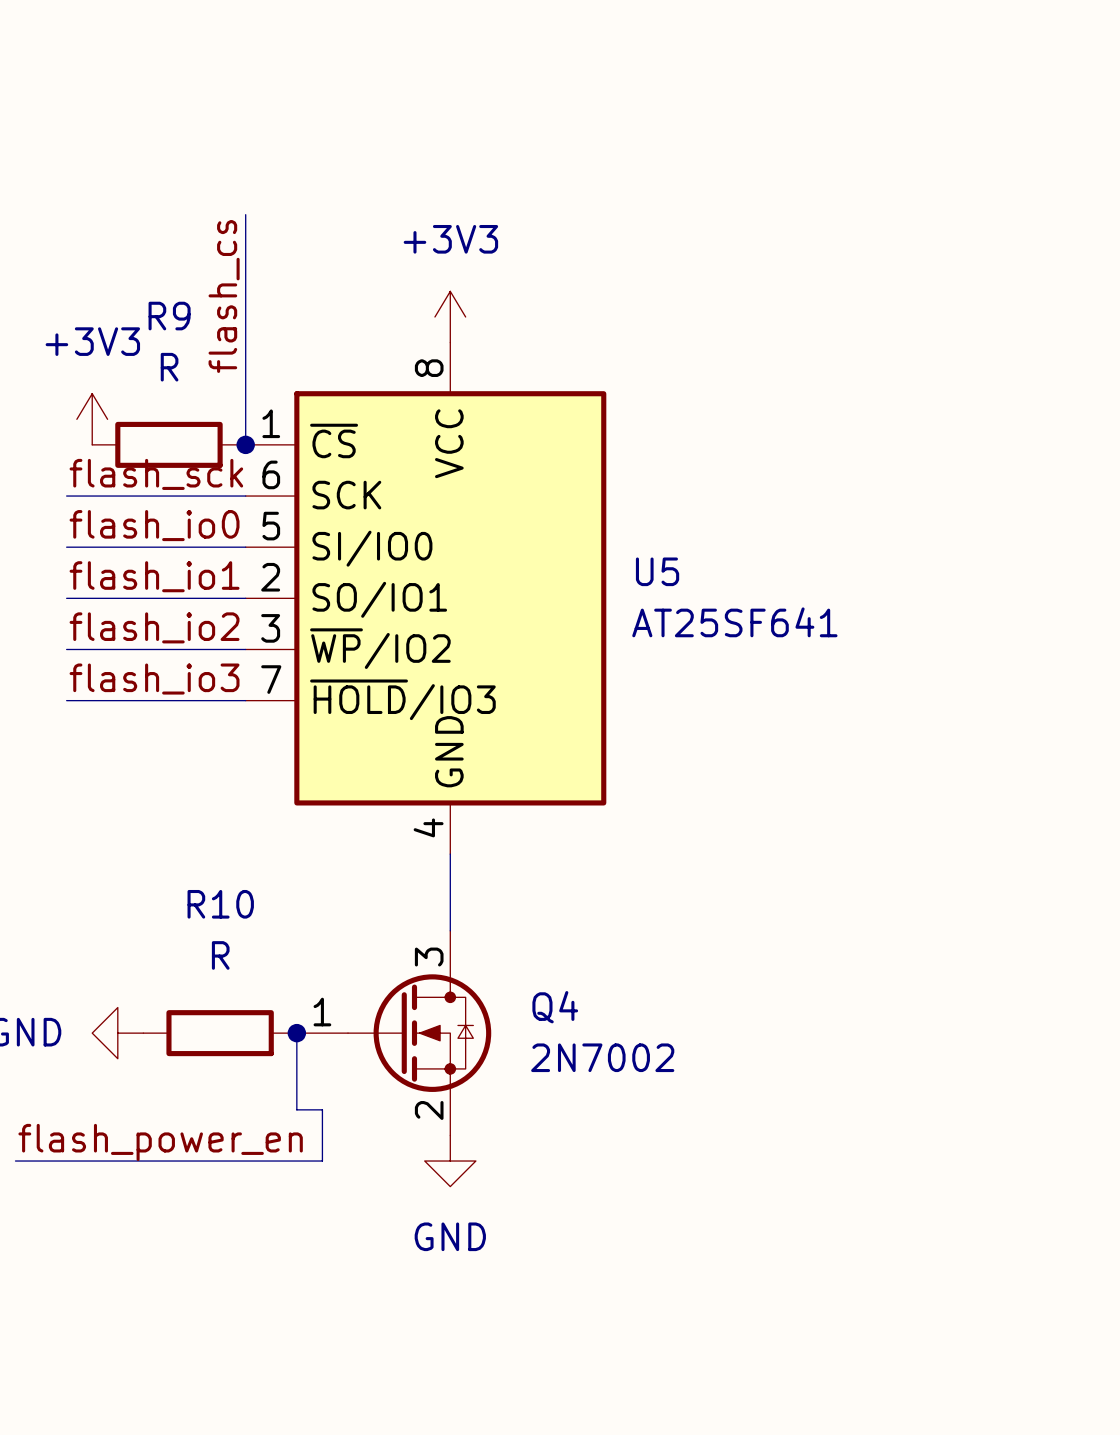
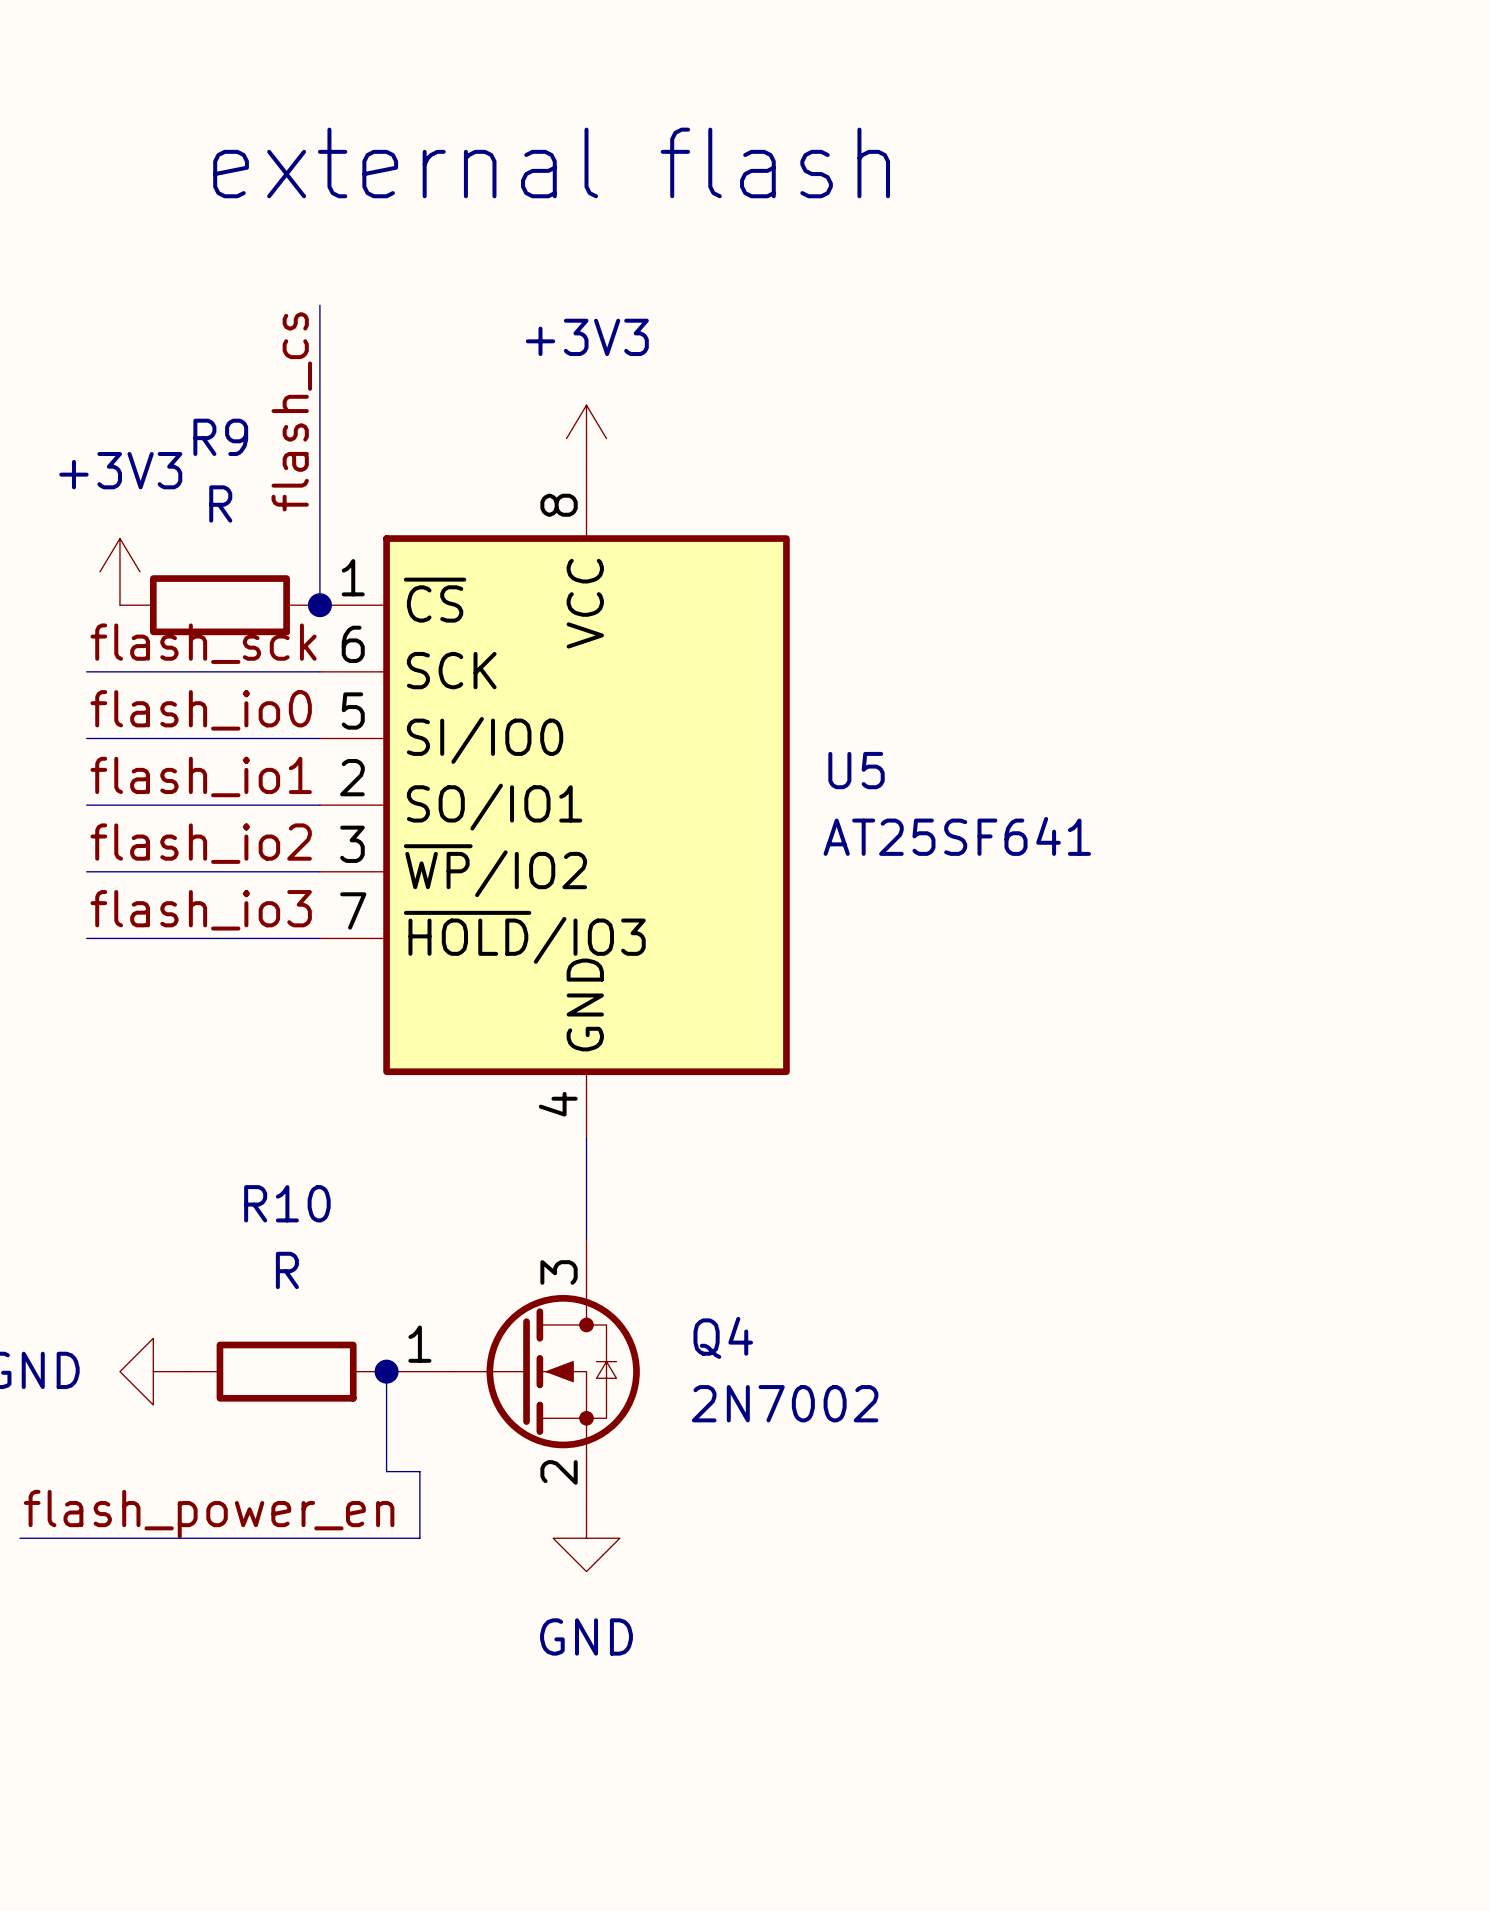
text: none -> external flash (551, 162)

